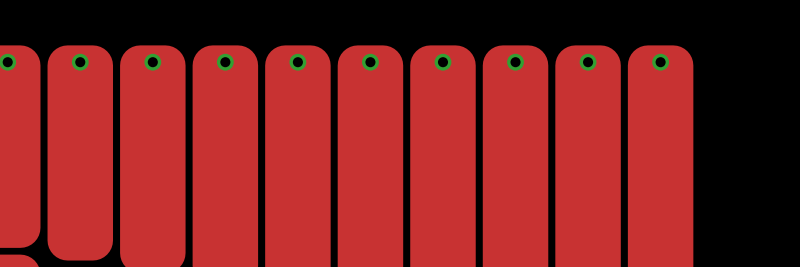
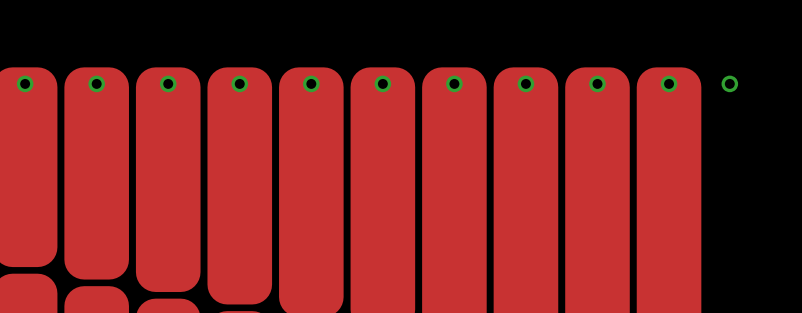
via: none -> (729, 83)

